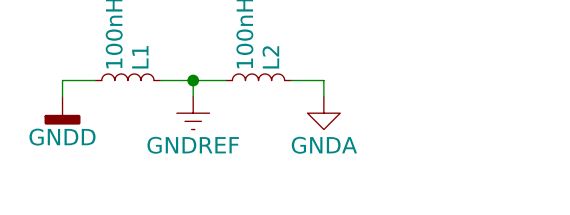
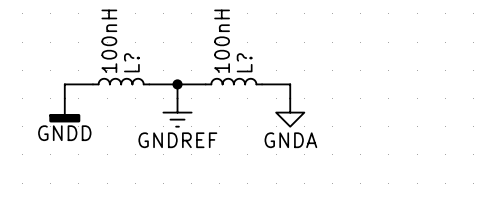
L1 name: L1 (140, 57) -> L? (131, 62)
L2 name: L2 (270, 57) -> L? (244, 62)

